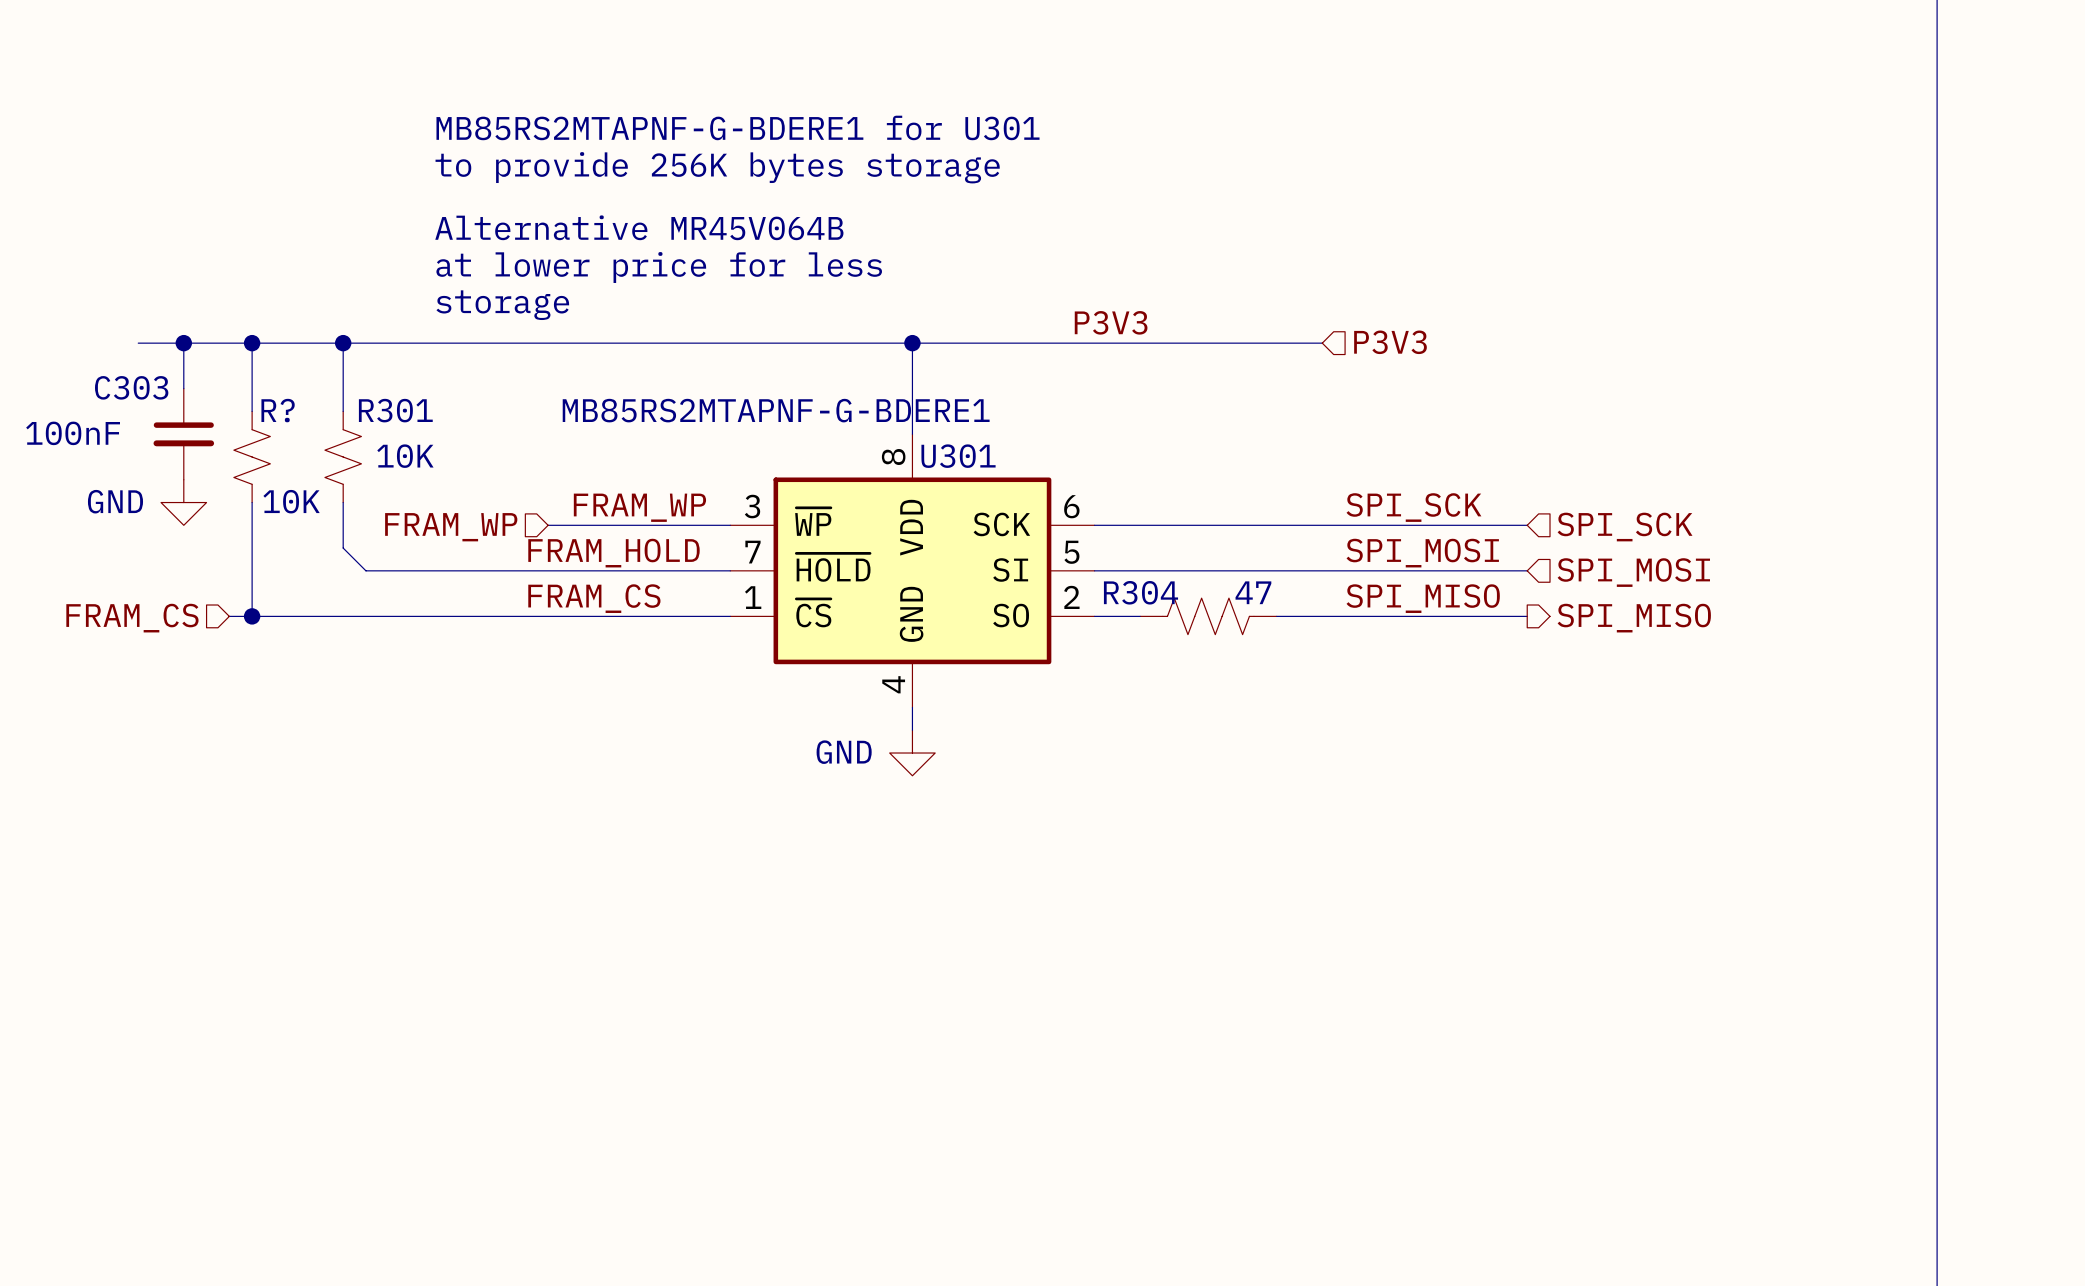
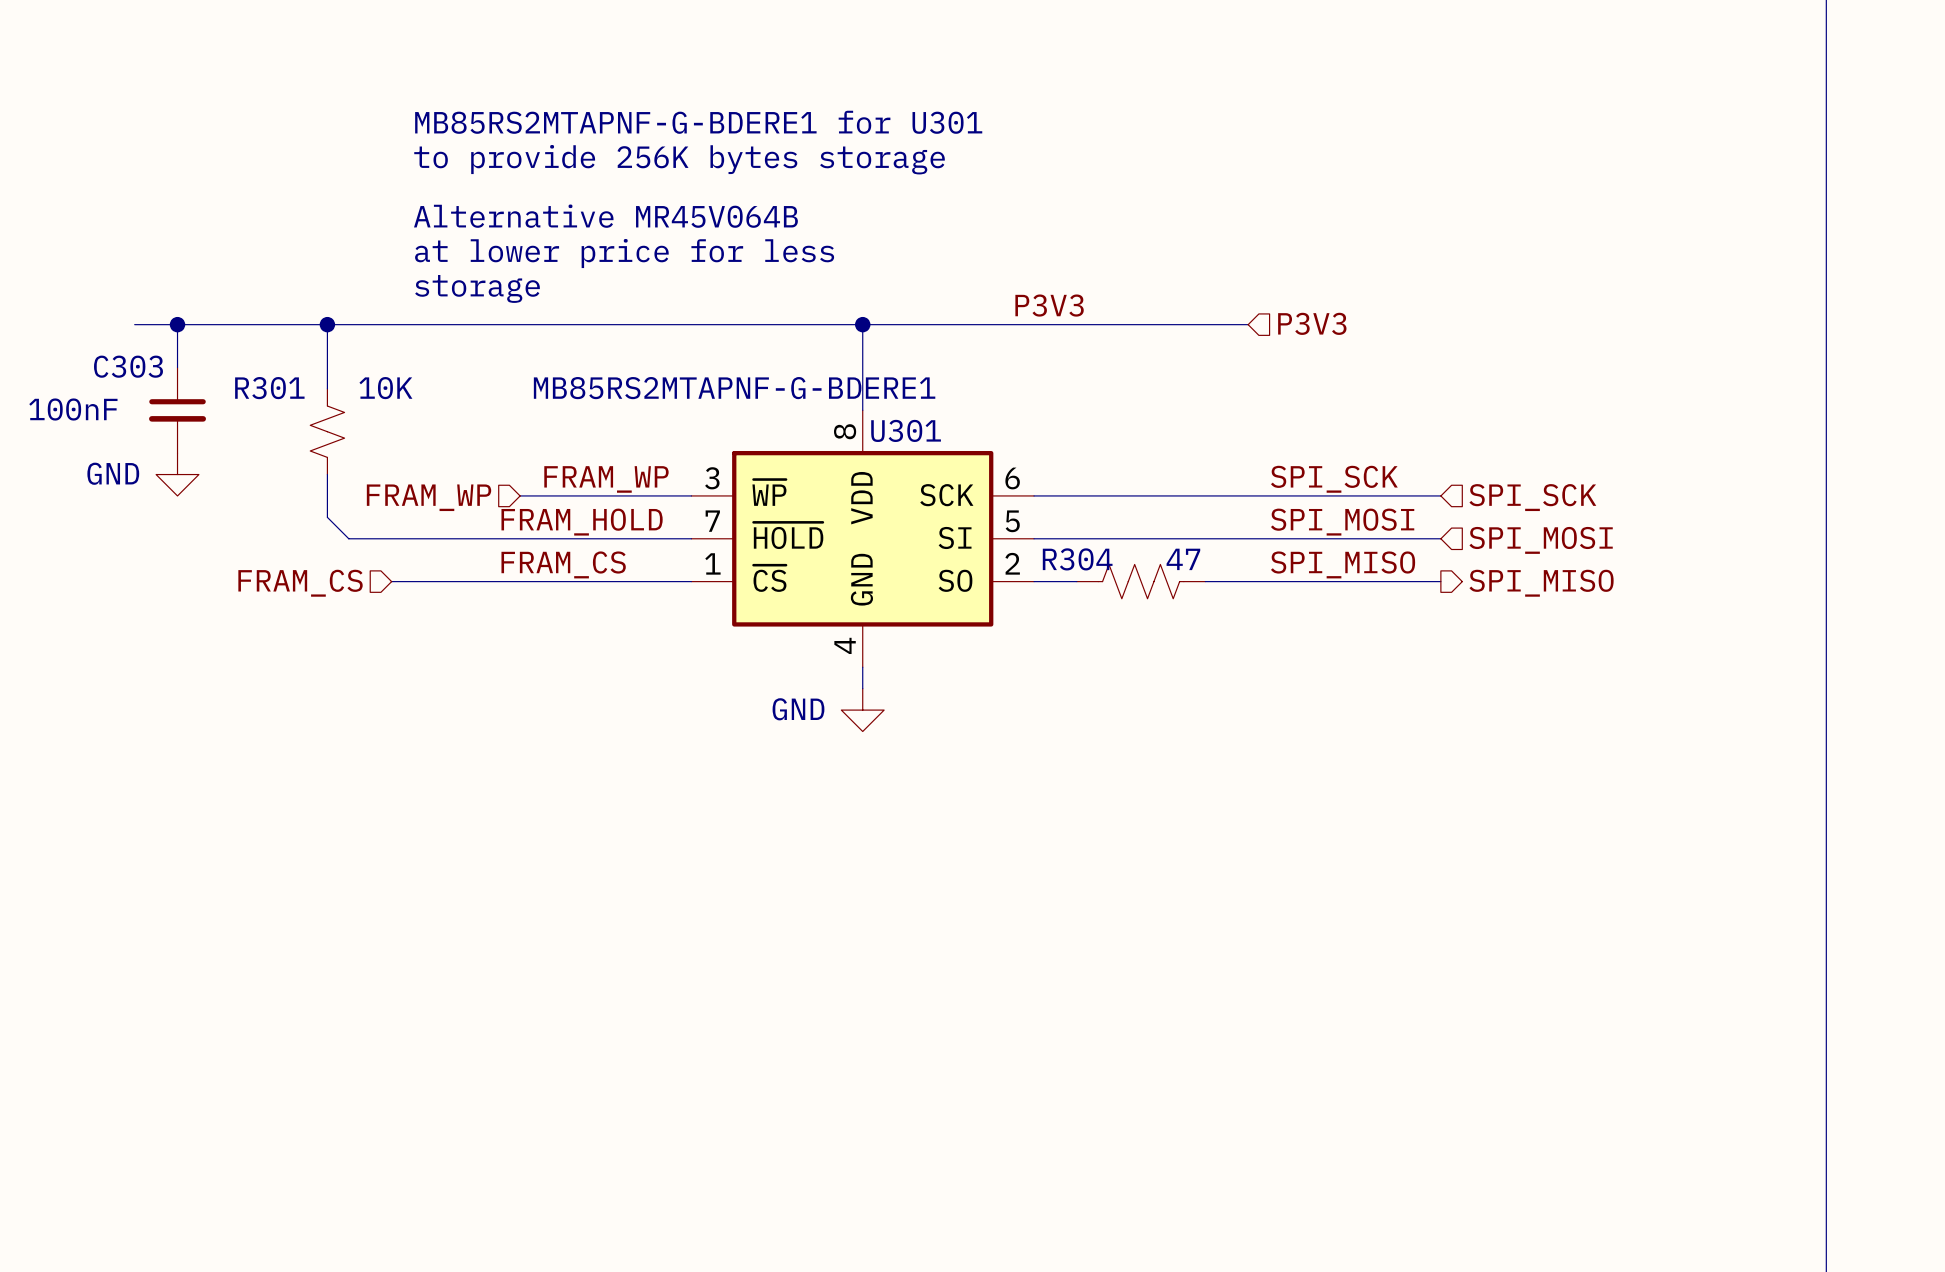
wire: (252, 343) (252, 411) -> none
junction: (252, 343) -> none
R301 name position: R301 (395, 410) -> R301 (269, 388)
R301 value position: 10K (405, 456) -> 10K (385, 388)
R?: 10K (252, 457) -> none
wire: (252, 502) (252, 616) -> none
wire: (229, 616) (411, 616) -> none
junction: (252, 616) -> none
hierarchical label position: FRAM_CS (132, 618) -> FRAM_CS (300, 583)

